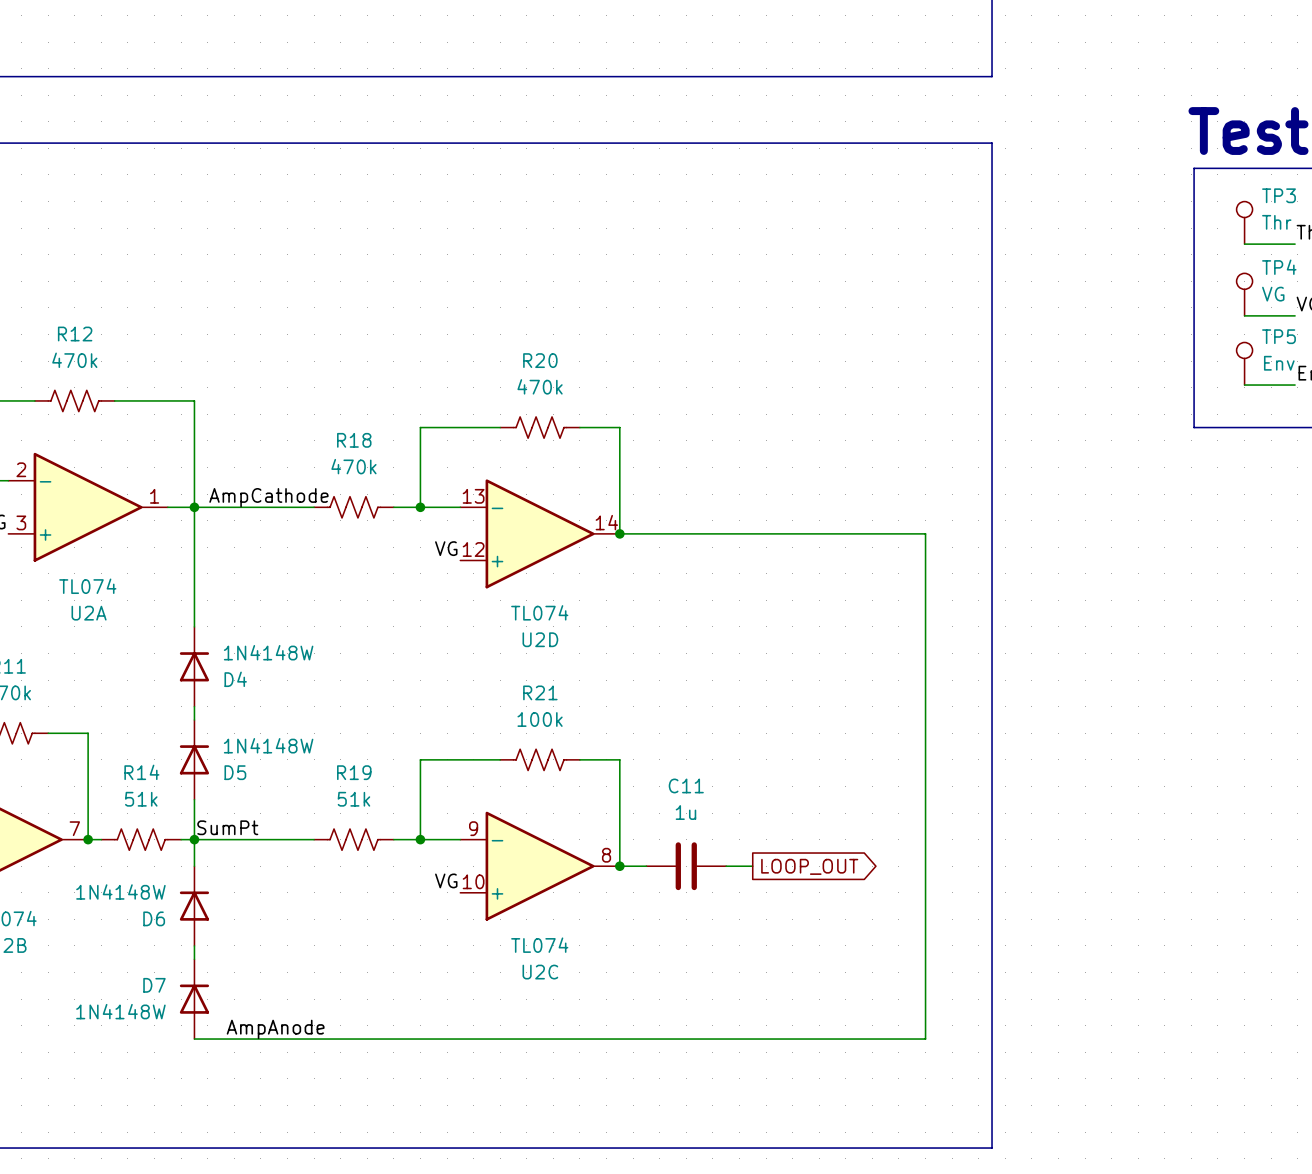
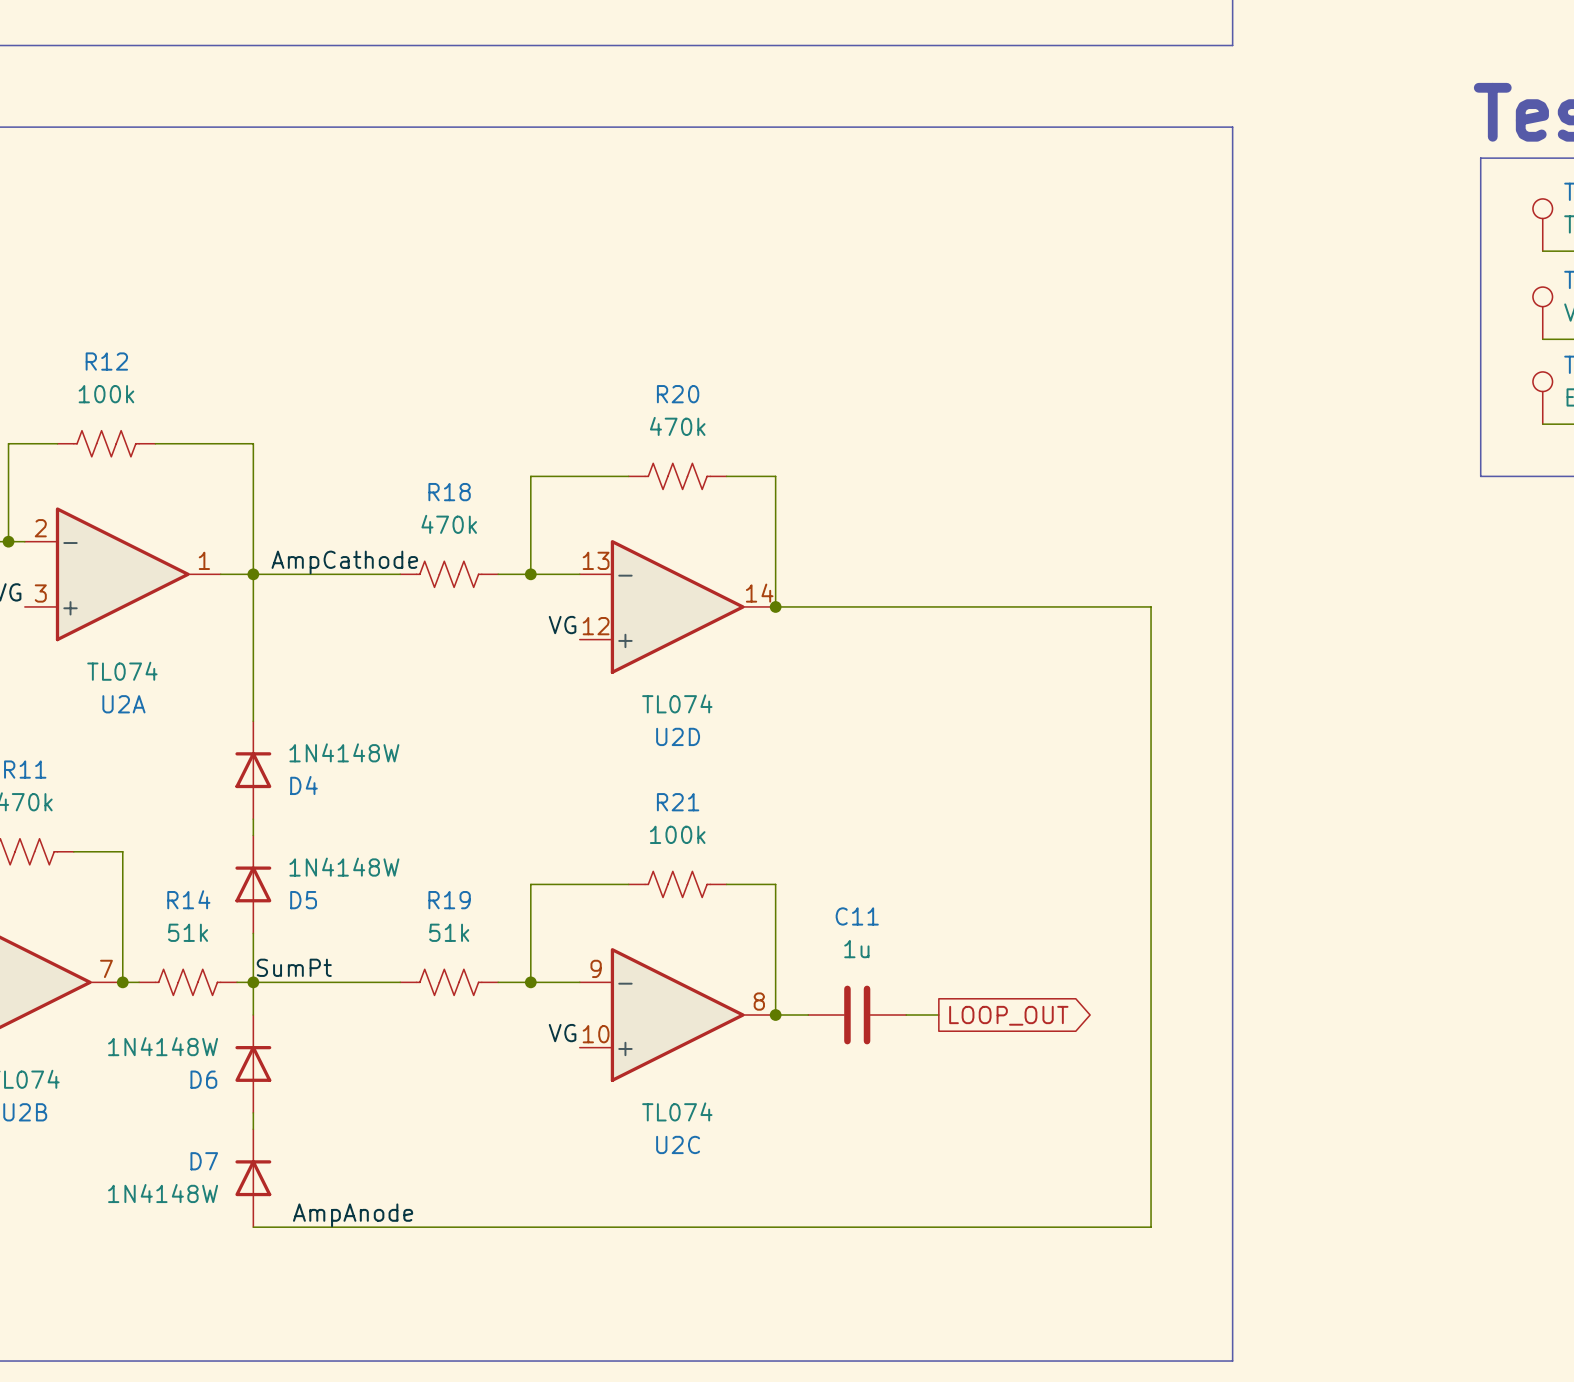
R12 value: 470k (74, 360) -> 100k (106, 394)

